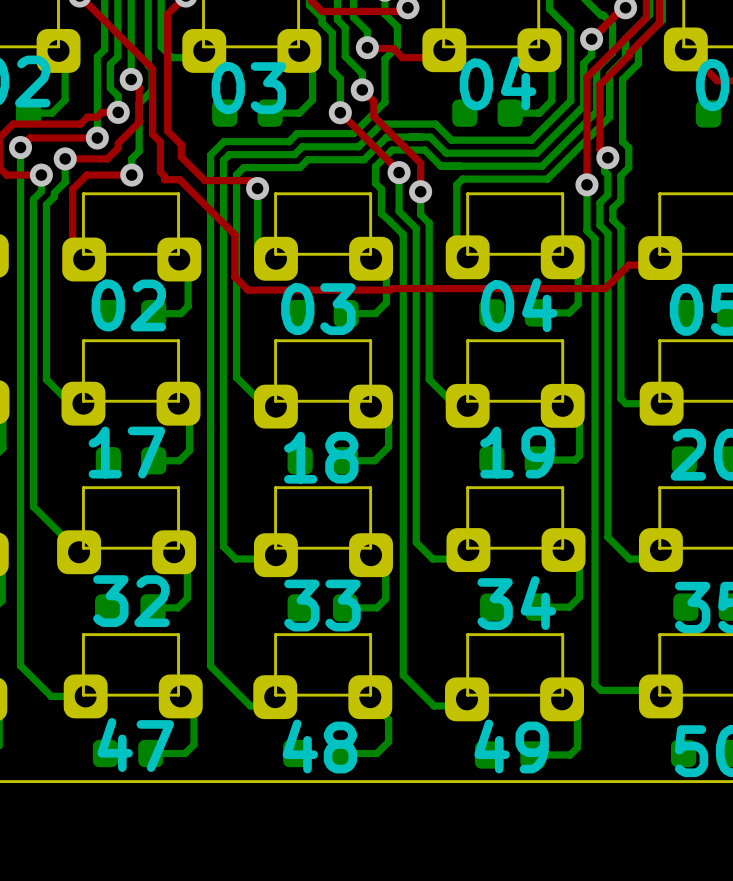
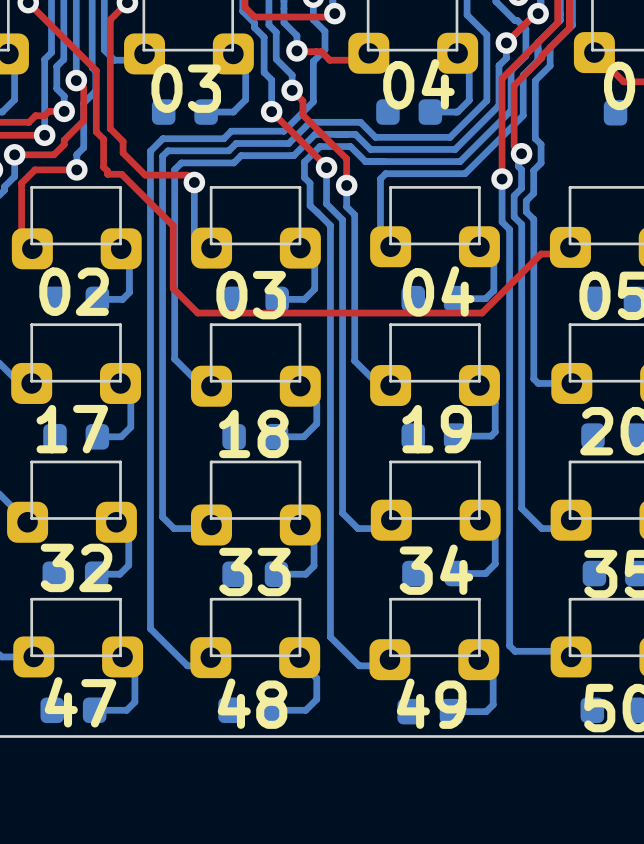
top track: (234, 277) (247, 290) (605, 288) -> (173, 265) (173, 288) (197, 313) (482, 313) (519, 275)

